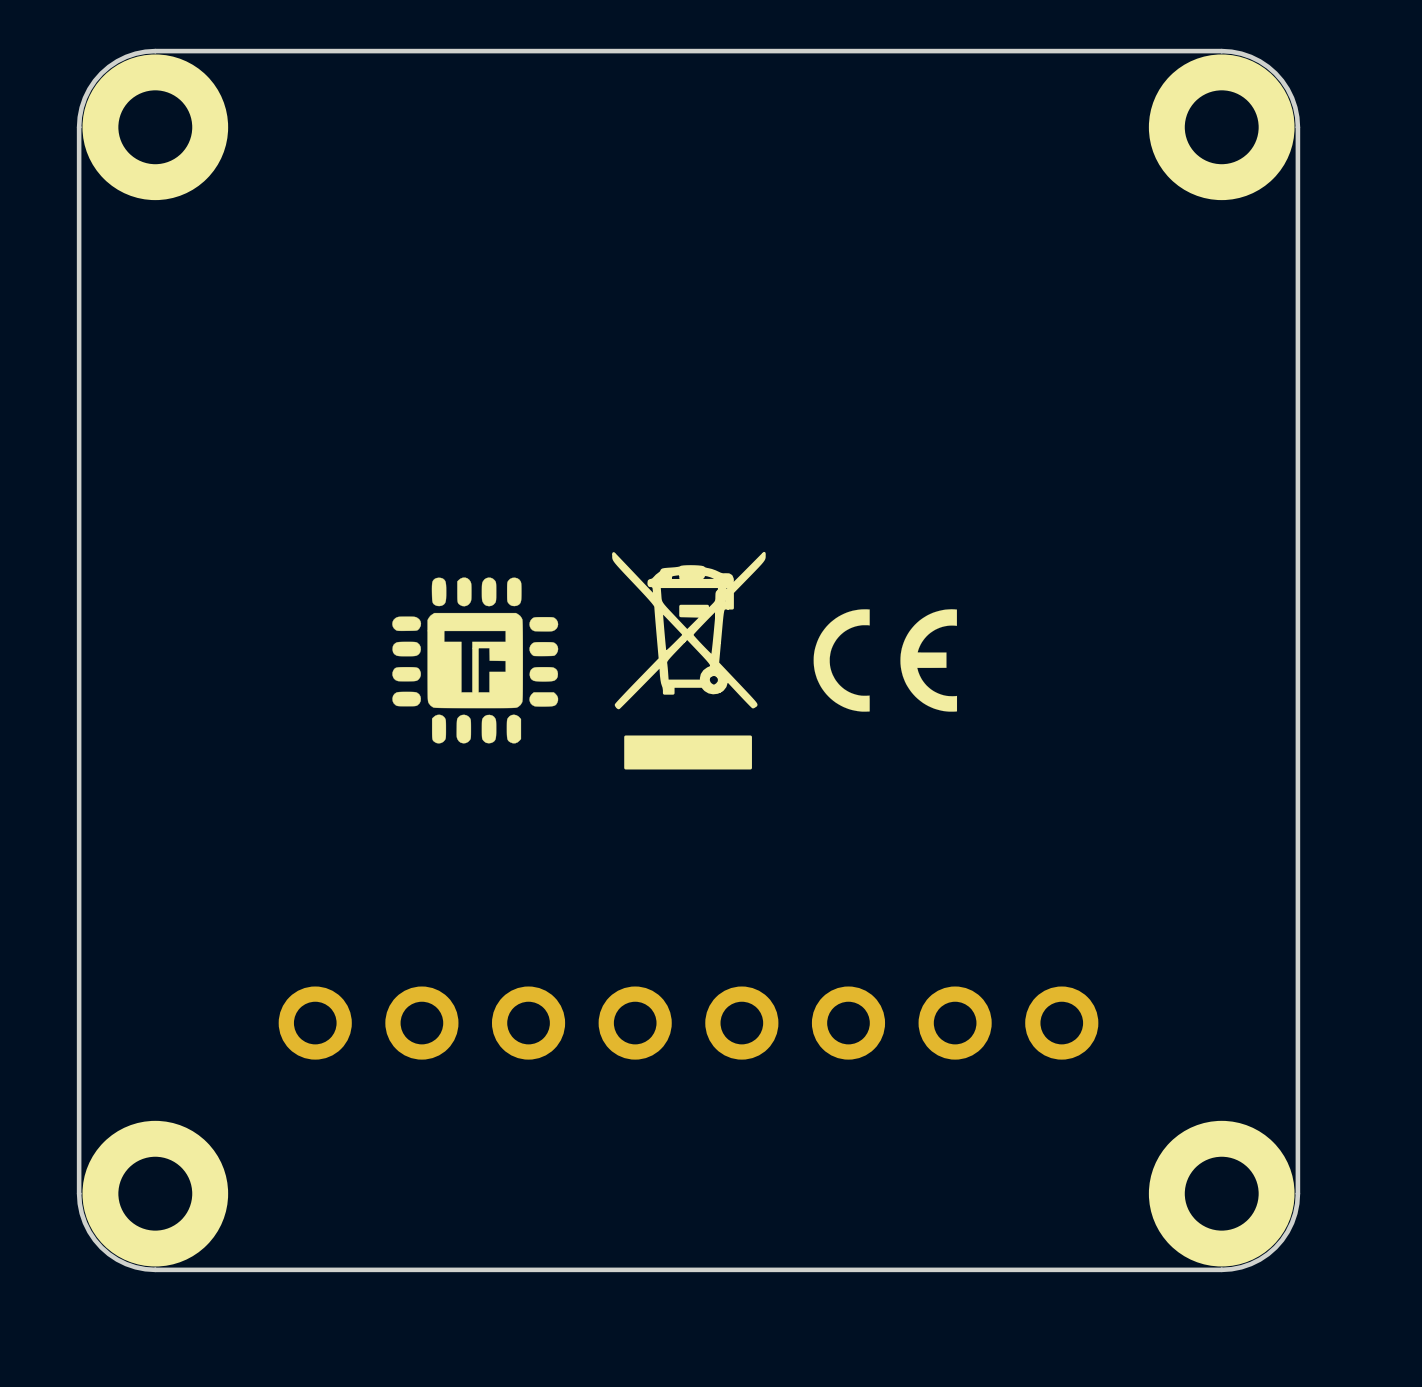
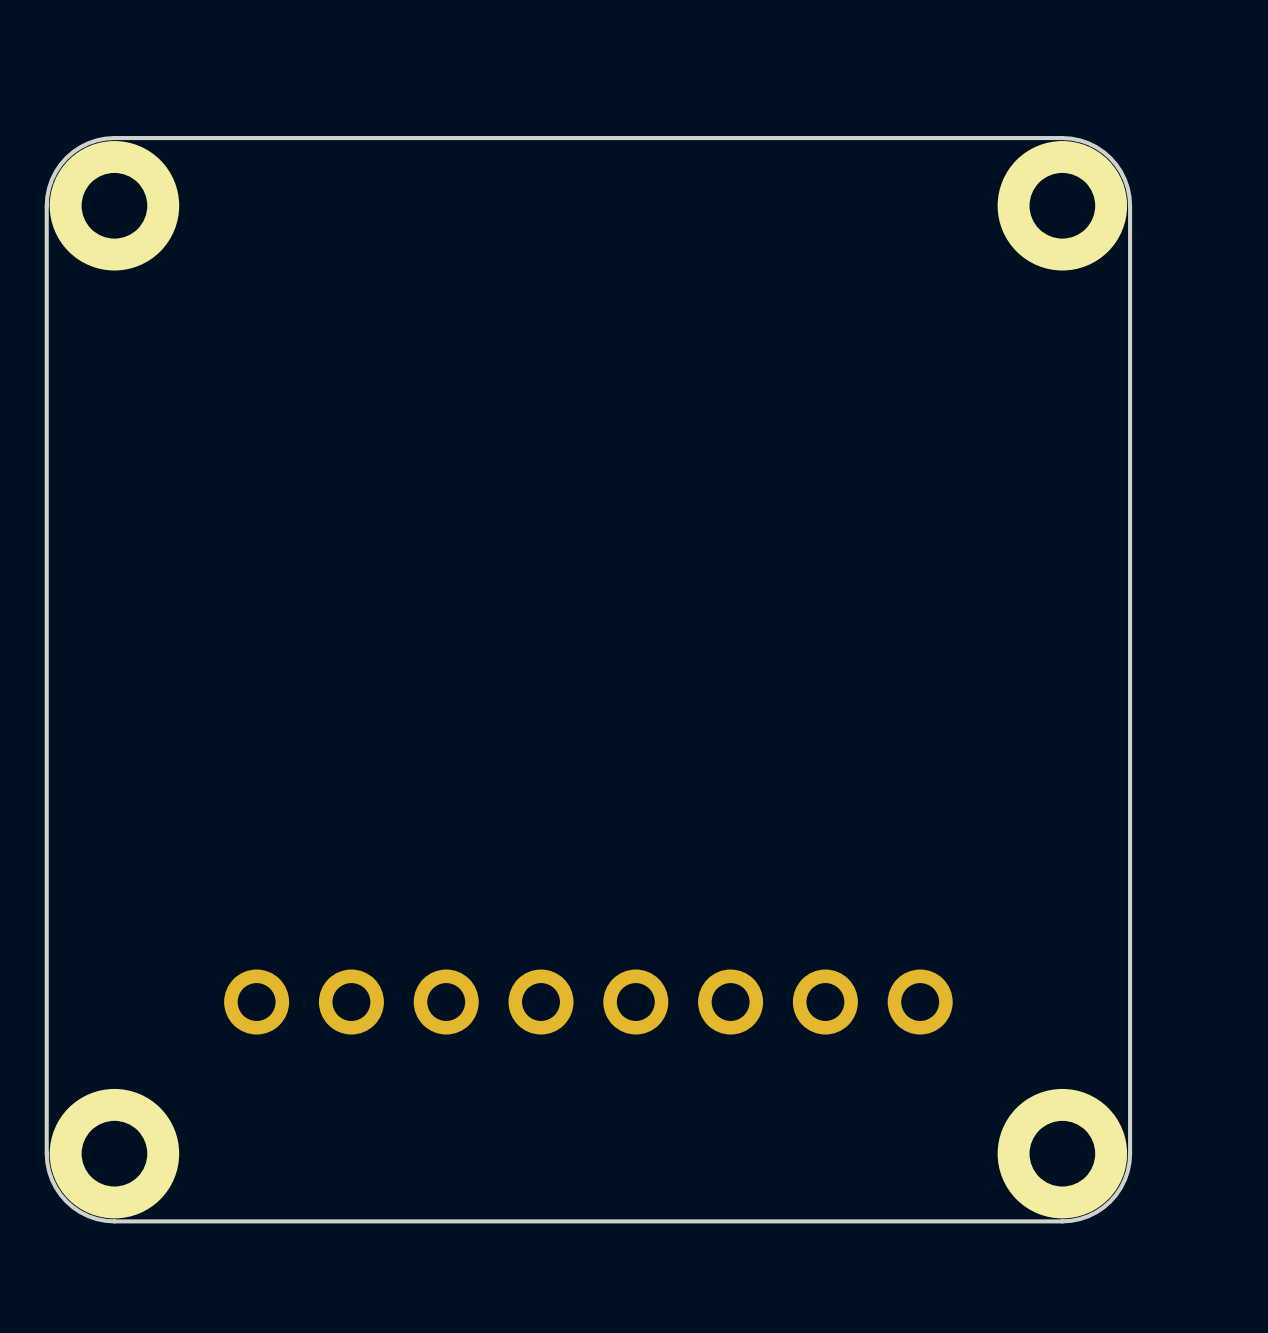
drawing: [612, 551, 766, 770] -> none
drawing: [392, 577, 559, 744] -> none
drawing: [813, 609, 958, 712] -> none

